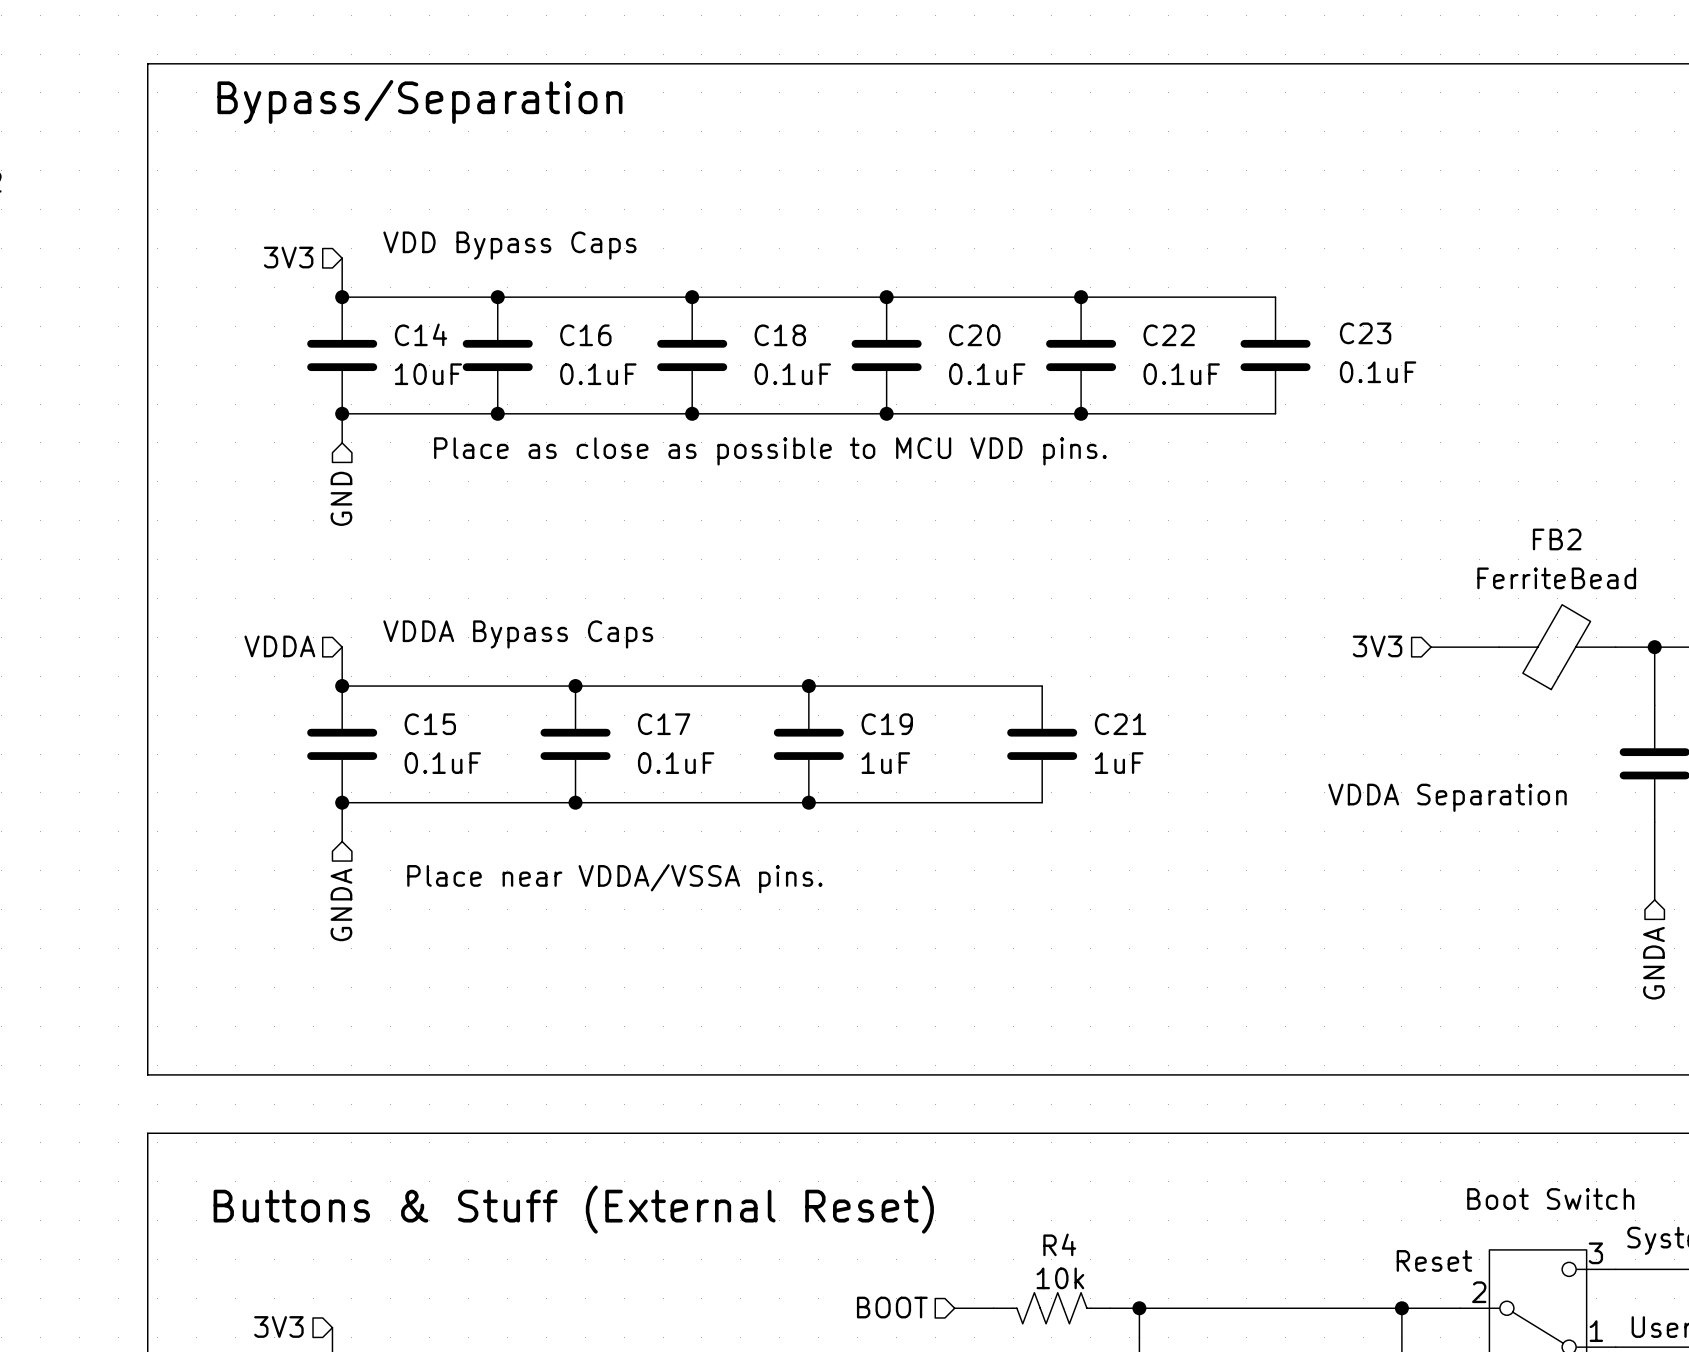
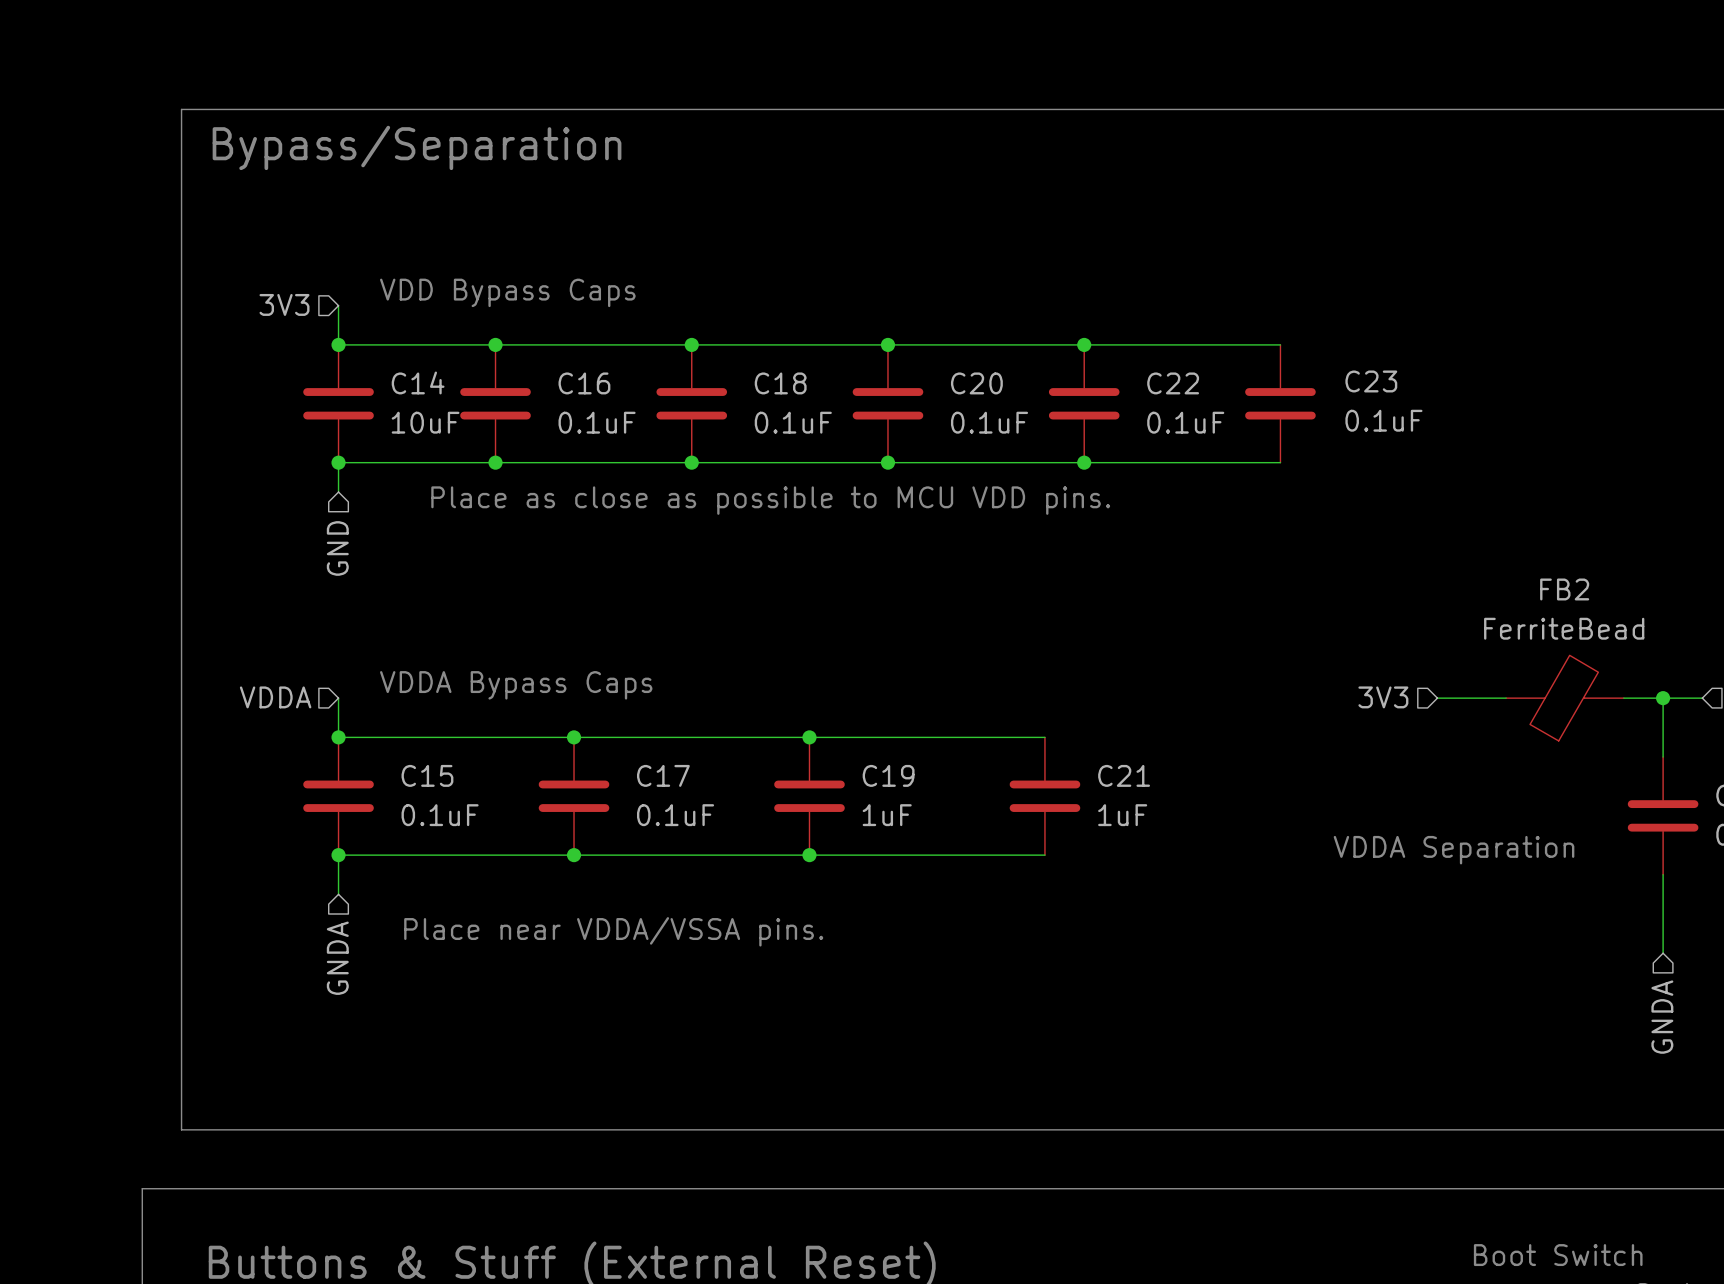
line: (186, 63) (147, 63) (147, 1074) (186, 1074) -> (181, 109) (181, 1129)

